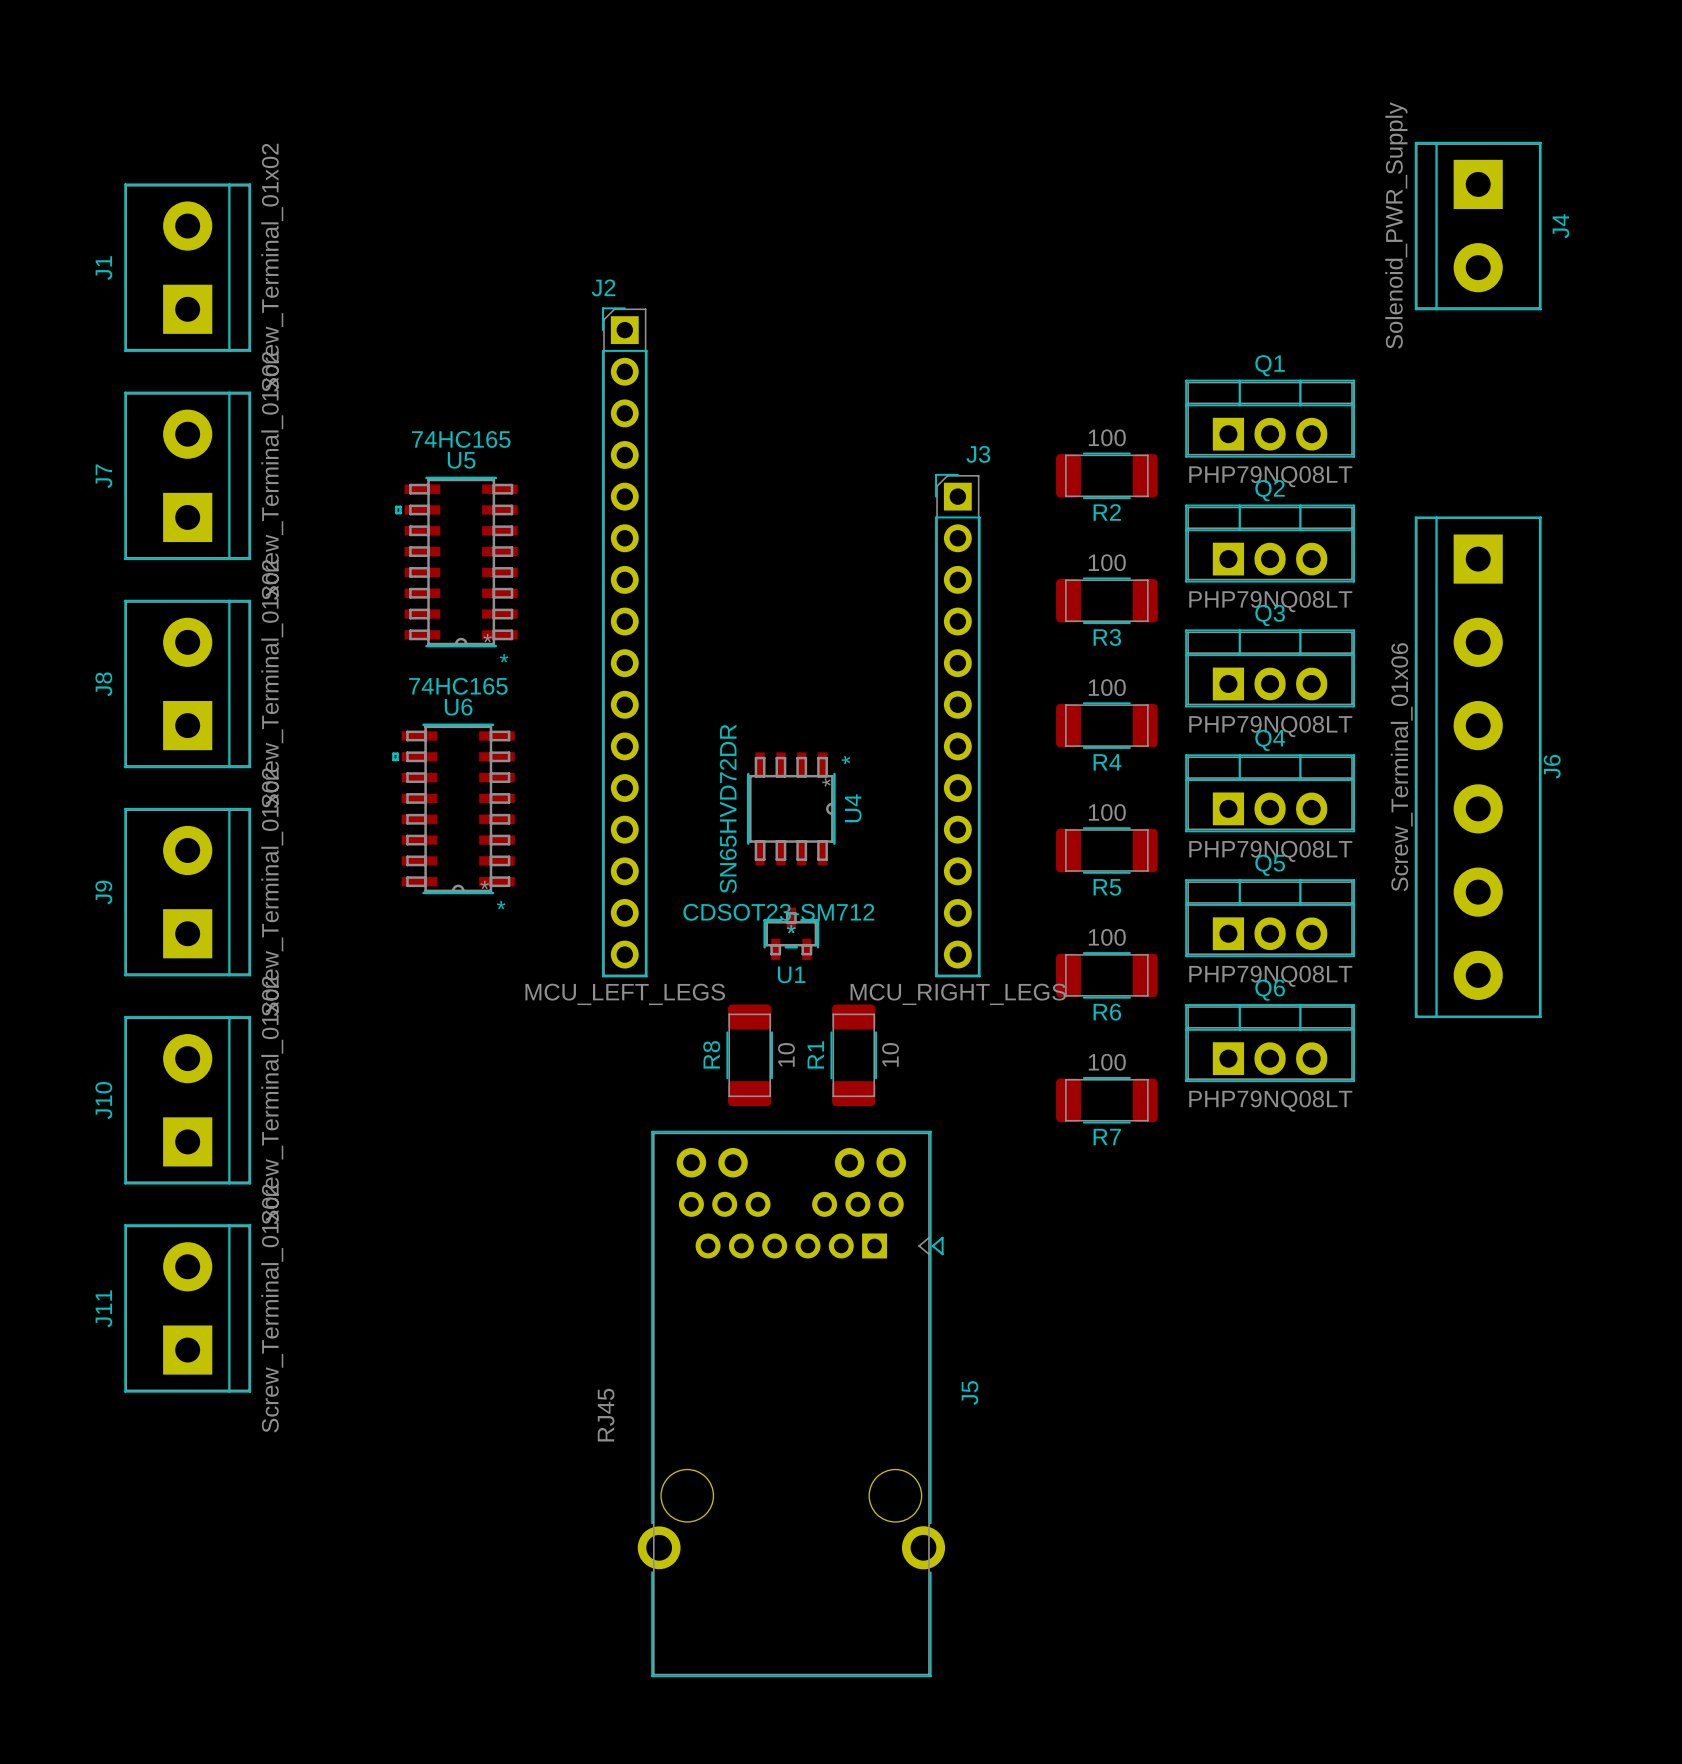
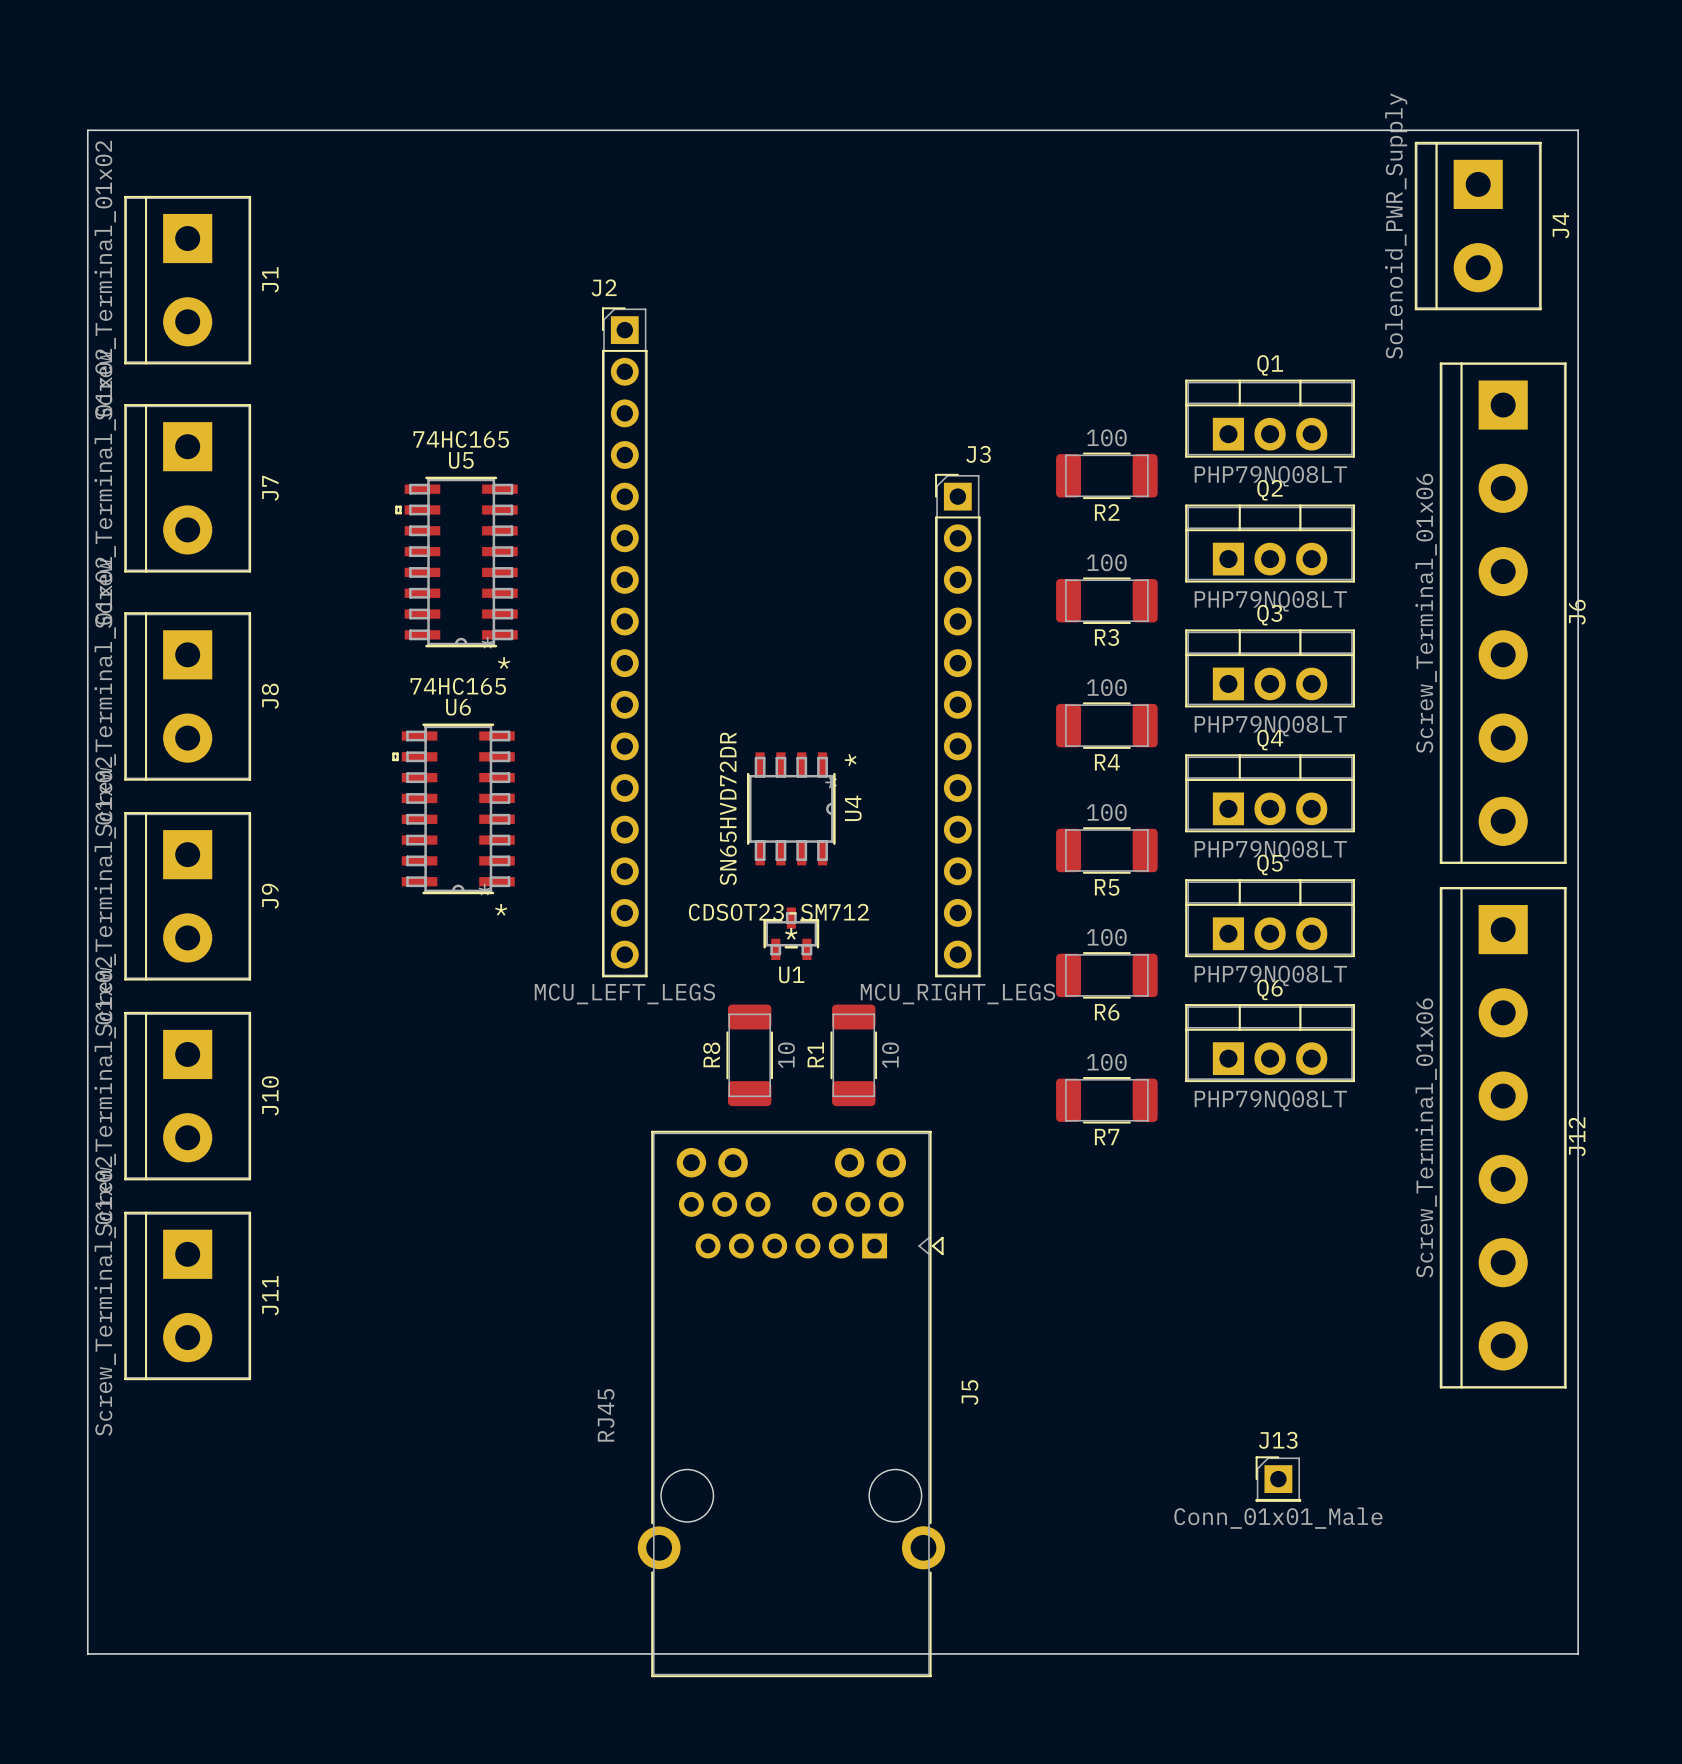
board edge: none -> (87, 130) (1578, 130) (1578, 1653) (87, 1653) (87, 130)
J1 rotation: 0° (187, 267) -> 180° (187, 280)
J7 rotation: 0° (187, 475) -> 180° (187, 488)
J8 rotation: 0° (187, 683) -> 180° (187, 696)
J6 position: (1478, 767) -> (1503, 613)
J9 rotation: 0° (187, 892) -> 180° (187, 896)
J10 rotation: 0° (187, 1100) -> 180° (187, 1096)
J12: none -> Screw_Terminal_01x06 (1503, 1137)
J11 rotation: 0° (187, 1308) -> 180° (187, 1295)
J13: none -> Conn_01x01_Male (1278, 1479)

